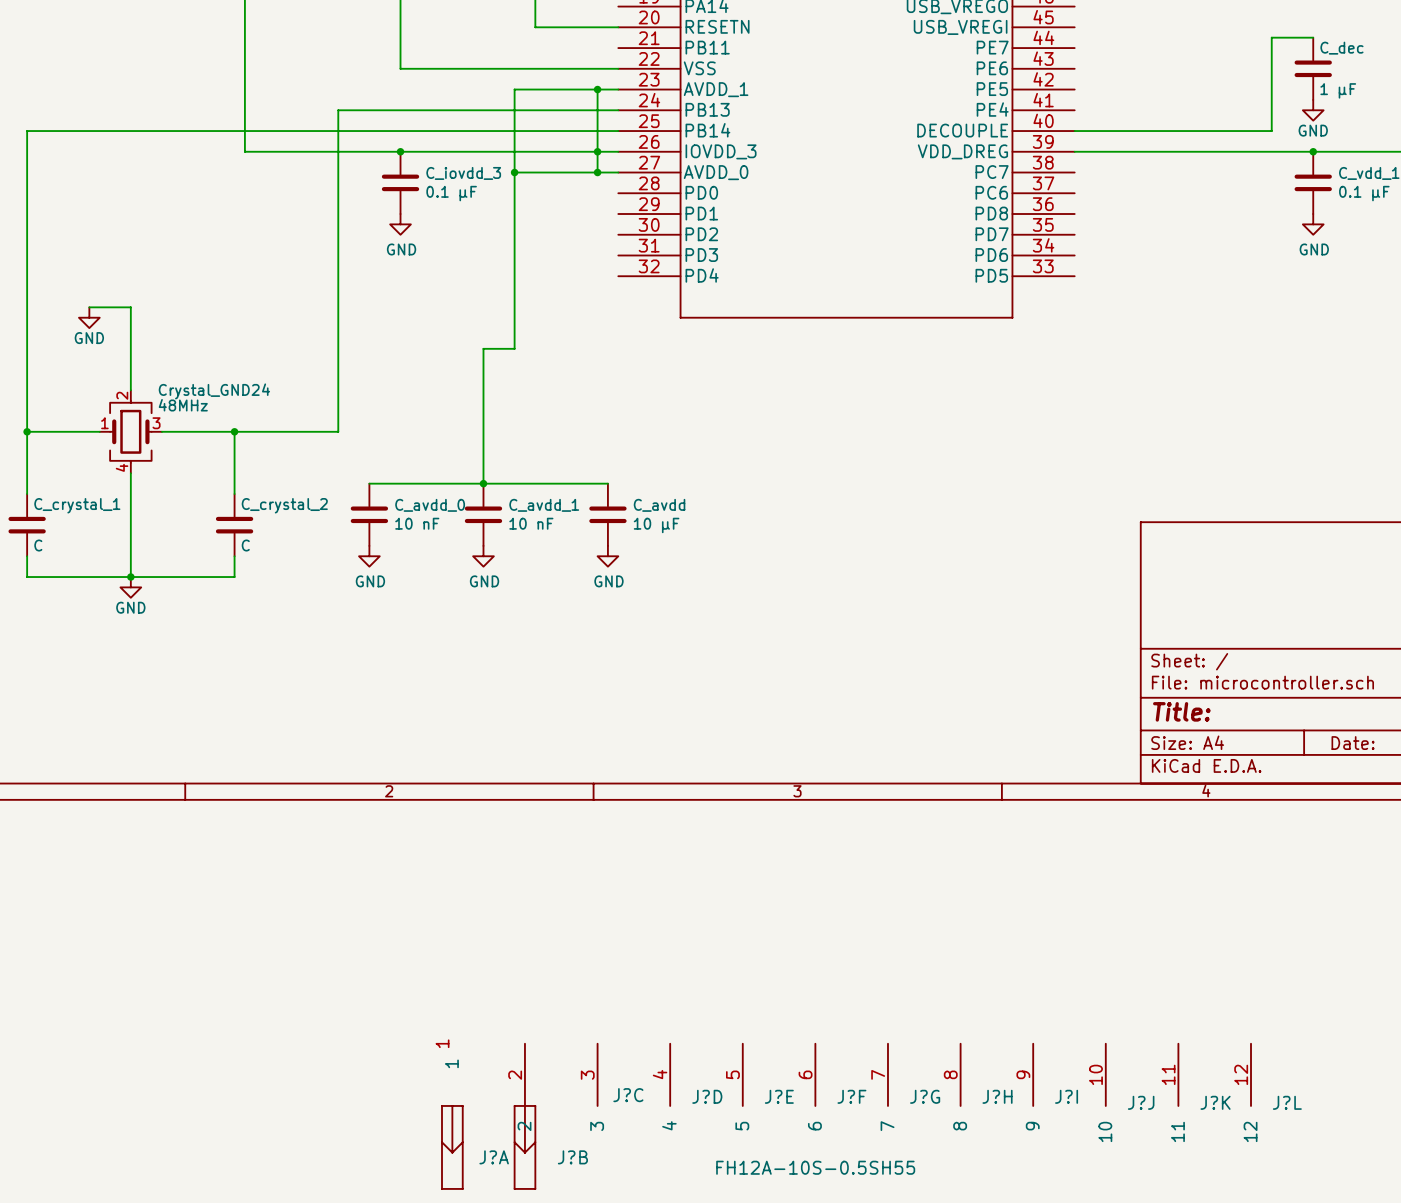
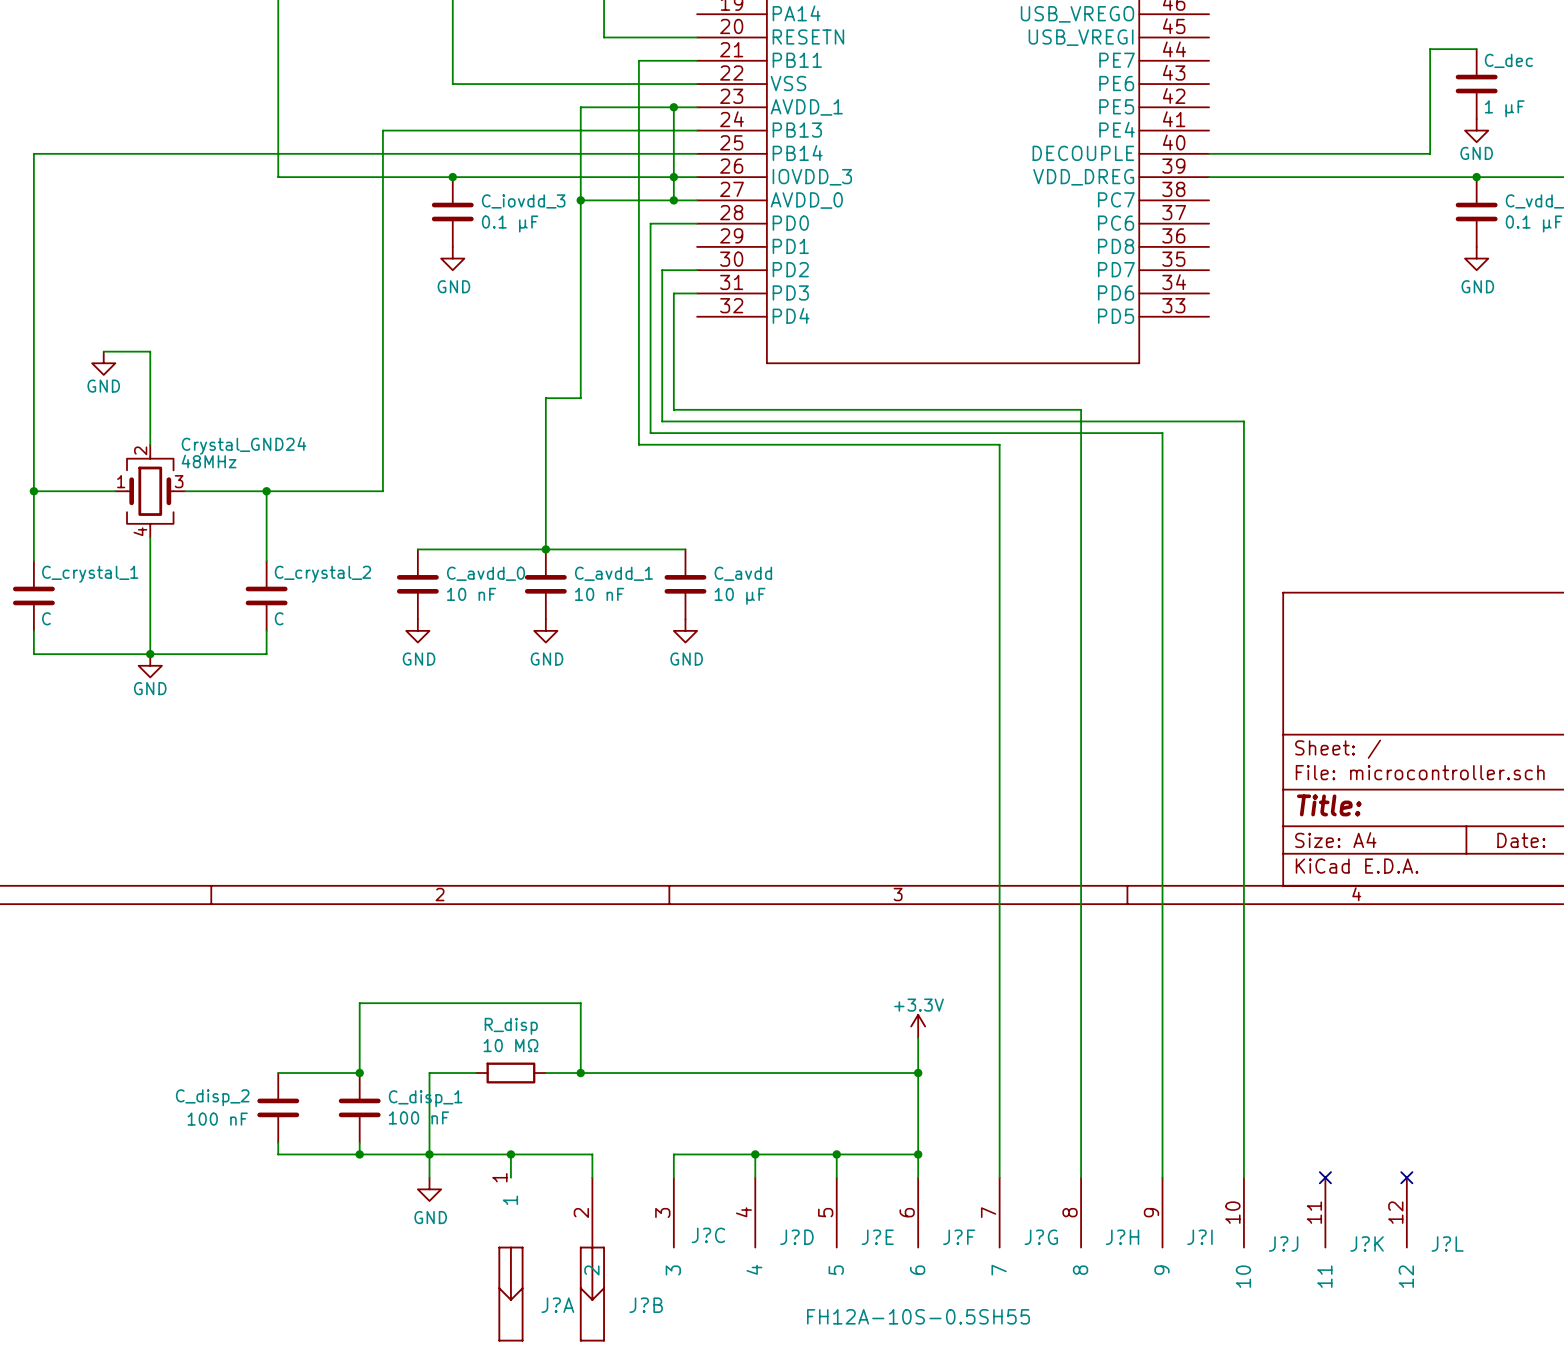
wire: none -> (697, 60) (638, 60) (638, 444) (999, 444) (999, 1177)
wire: none -> (697, 223) (650, 223) (650, 433) (1162, 433) (1162, 1177)
wire: none -> (697, 270) (662, 270) (662, 421) (1243, 421) (1243, 1177)
wire: none -> (697, 293) (673, 293) (673, 409) (1081, 409) (1081, 1177)
power symbol: none -> +3.3V (918, 1026)
wire: none -> (918, 1038) (918, 1177)
wire: none -> (278, 1073) (359, 1073) (359, 1003) (580, 1003) (580, 1073)
junction: none -> (359, 1073)
wire: none -> (476, 1073) (429, 1073) (429, 1177)
R_disp: none -> 10 MΩ (510, 1073)
wire: none -> (545, 1073) (918, 1073)
junction: none -> (580, 1073)
junction: none -> (918, 1073)
C_disp_2: none -> 100 nF (278, 1107)
C_disp_1: none -> 100 nF (359, 1107)
wire: none -> (278, 1142) (278, 1154) (592, 1154) (592, 1177)
wire: none -> (359, 1142) (359, 1154)
junction: none -> (359, 1154)
junction: none -> (429, 1154)
wire: none -> (510, 1154) (510, 1177)
junction: none -> (510, 1154)
wire: none -> (755, 1154) (755, 1177)
junction: none -> (755, 1154)
wire: none -> (836, 1154) (836, 1177)
junction: none -> (836, 1154)
wire: none -> (918, 1154) (673, 1154) (673, 1177)
junction: none -> (918, 1154)
no-connect mark: none -> (1325, 1177)
no-connect mark: none -> (1406, 1177)
power symbol: none -> GND (429, 1189)

